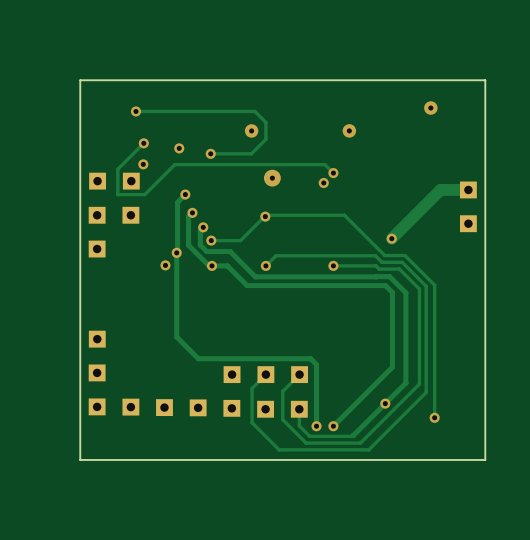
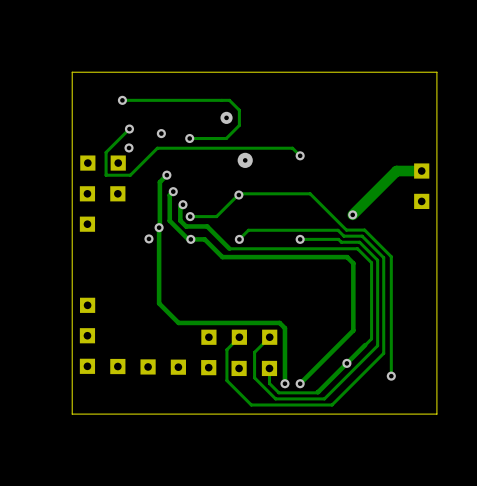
via: (430, 108) -> none
via: (349, 130) -> none
via: (323, 182) -> none
track: (254, 276) (375, 276) -> (229, 248) (357, 248) (371, 262) (371, 338) (317, 392)
track: (376, 276) (389, 276) (405, 292) (405, 383) -> none

